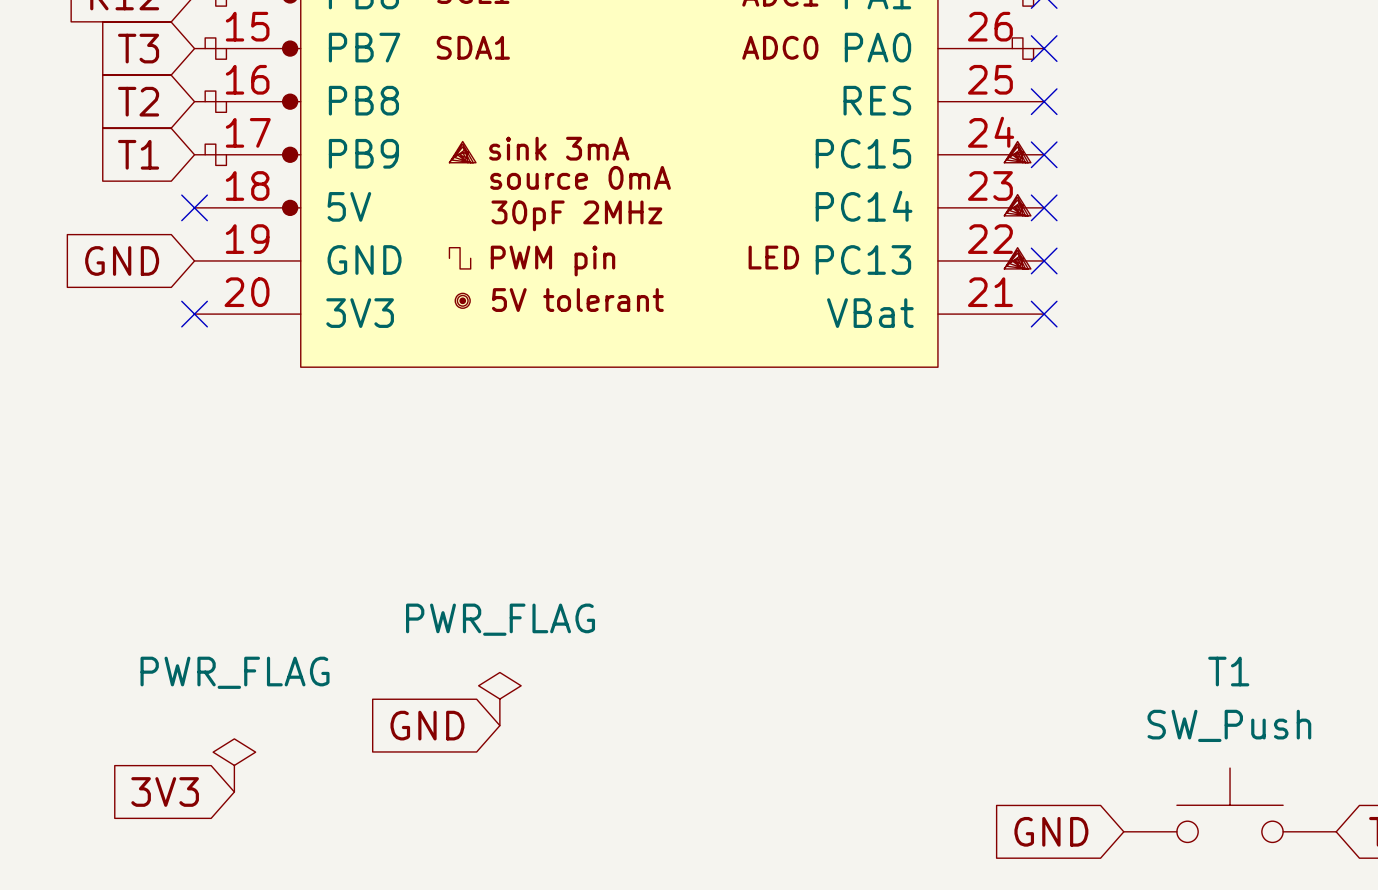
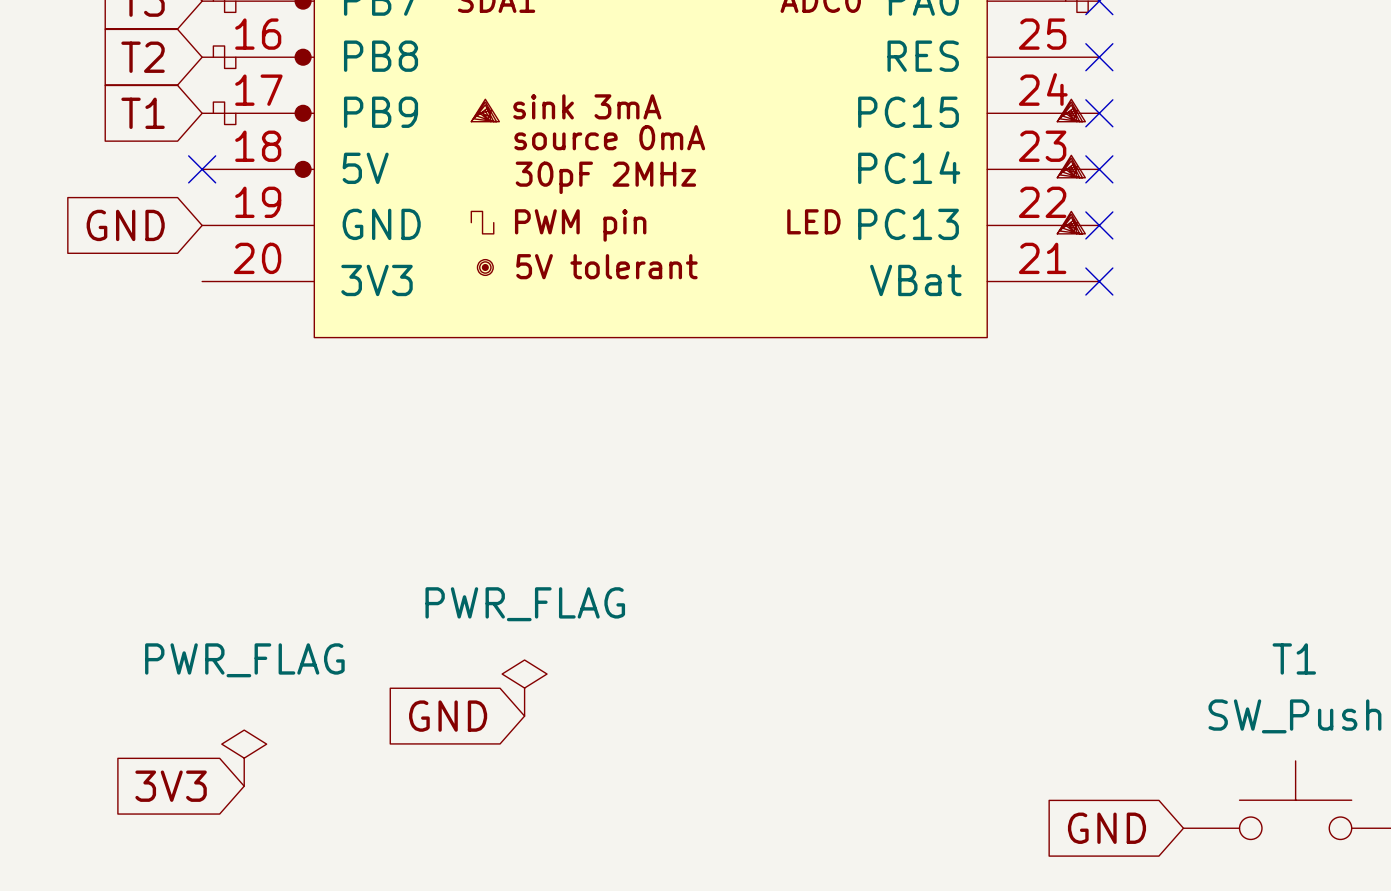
no-connect mark: (194, 314) -> none

